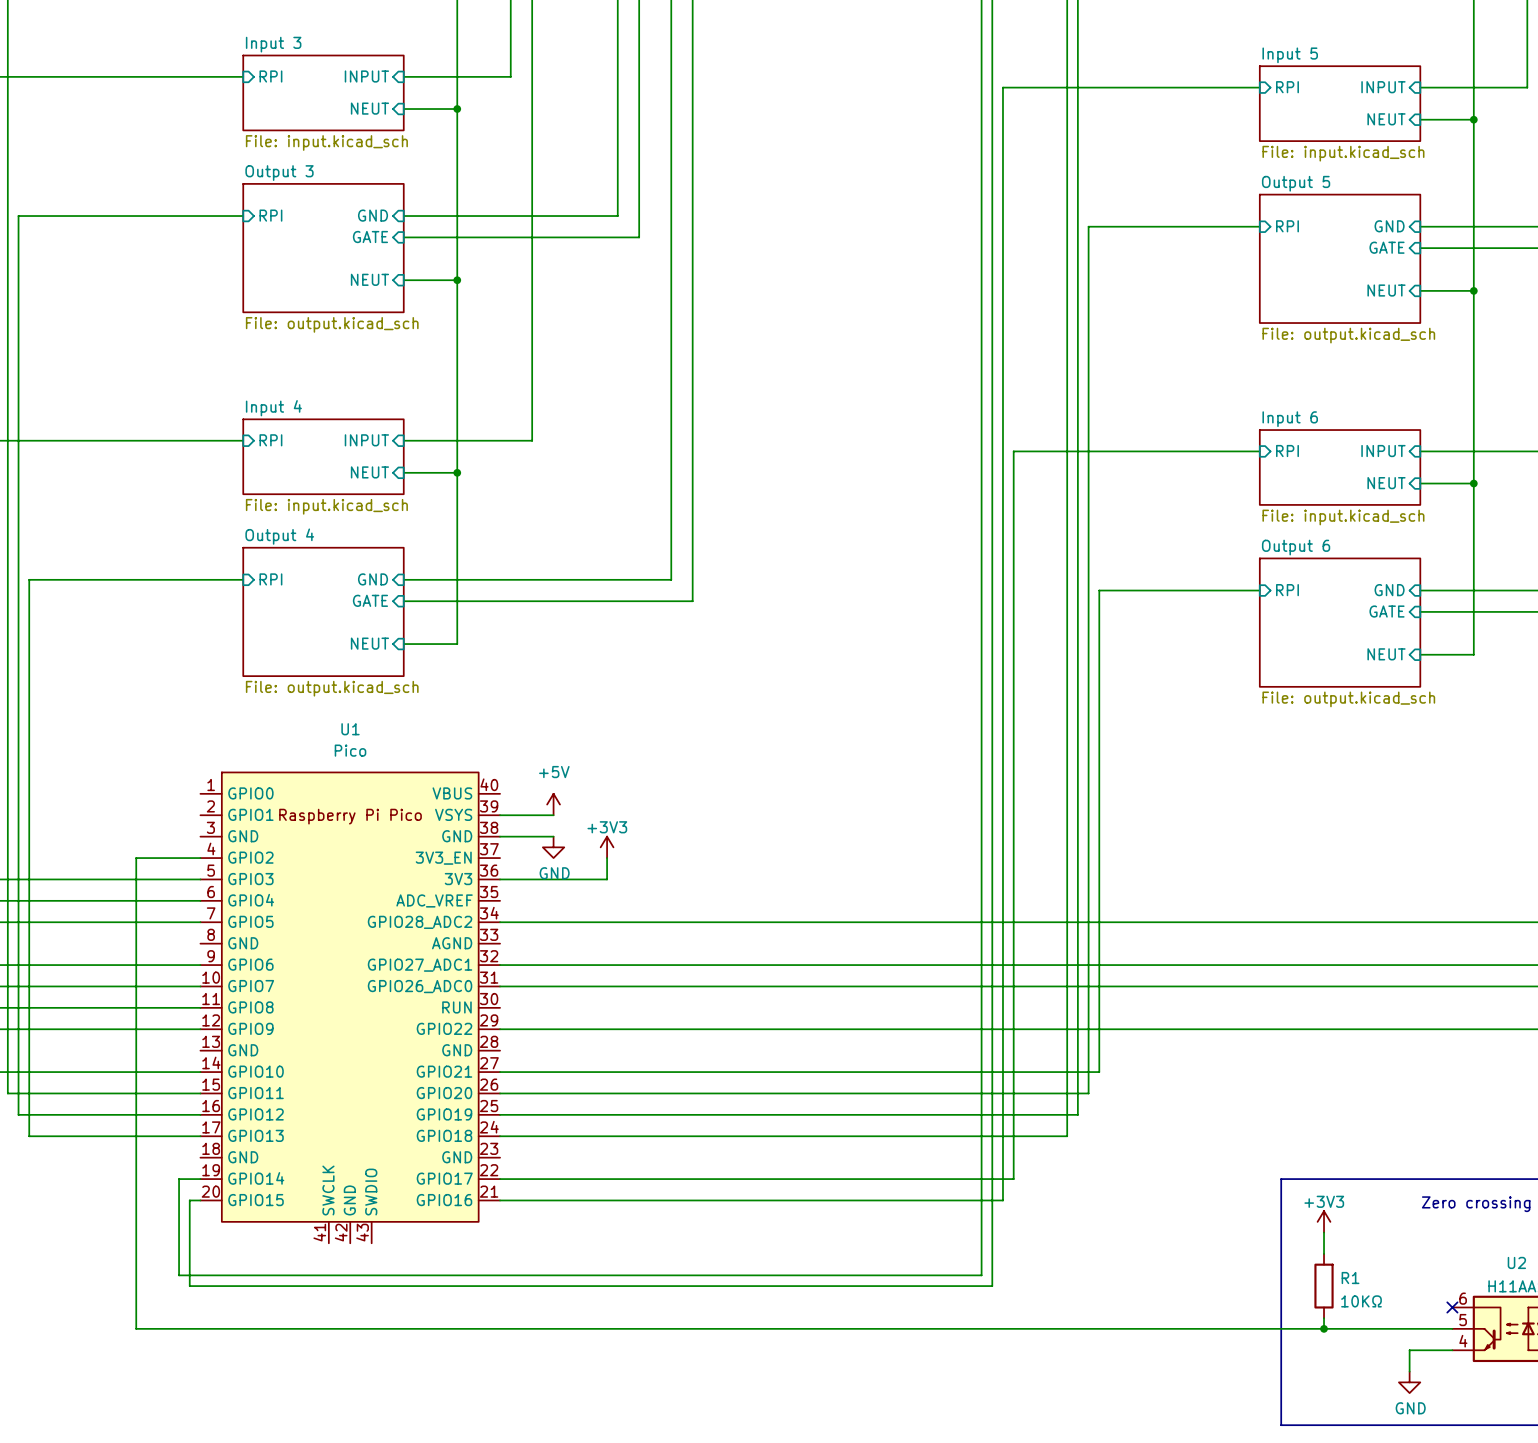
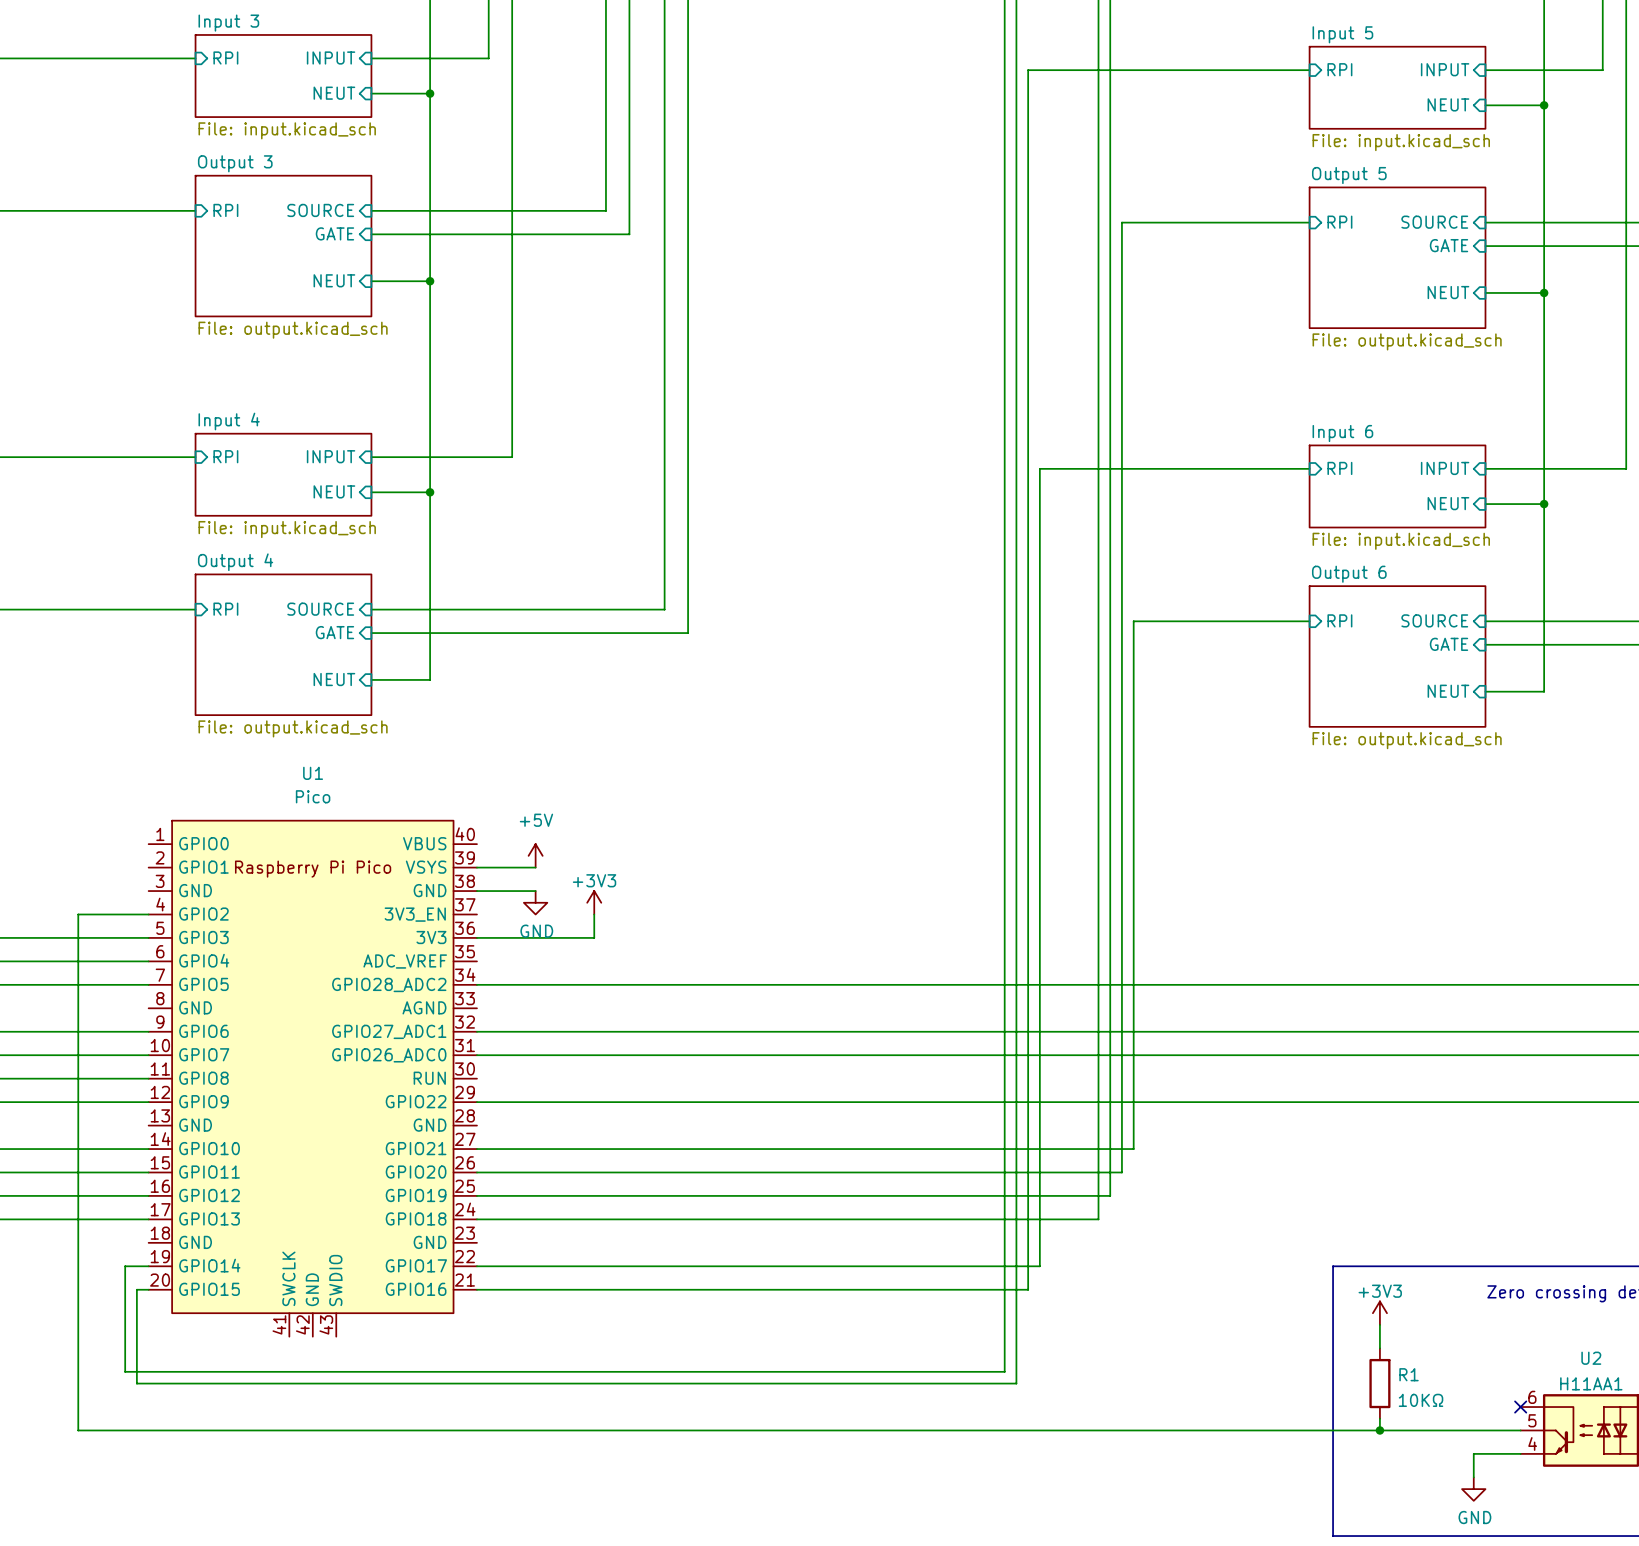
sheet pin: GND (373, 215) -> SOURCE (320, 210)
sheet pin: GND (1389, 226) -> SOURCE (1434, 222)
sheet pin: GND (373, 579) -> SOURCE (320, 609)
sheet pin: GND (1389, 590) -> SOURCE (1434, 620)

